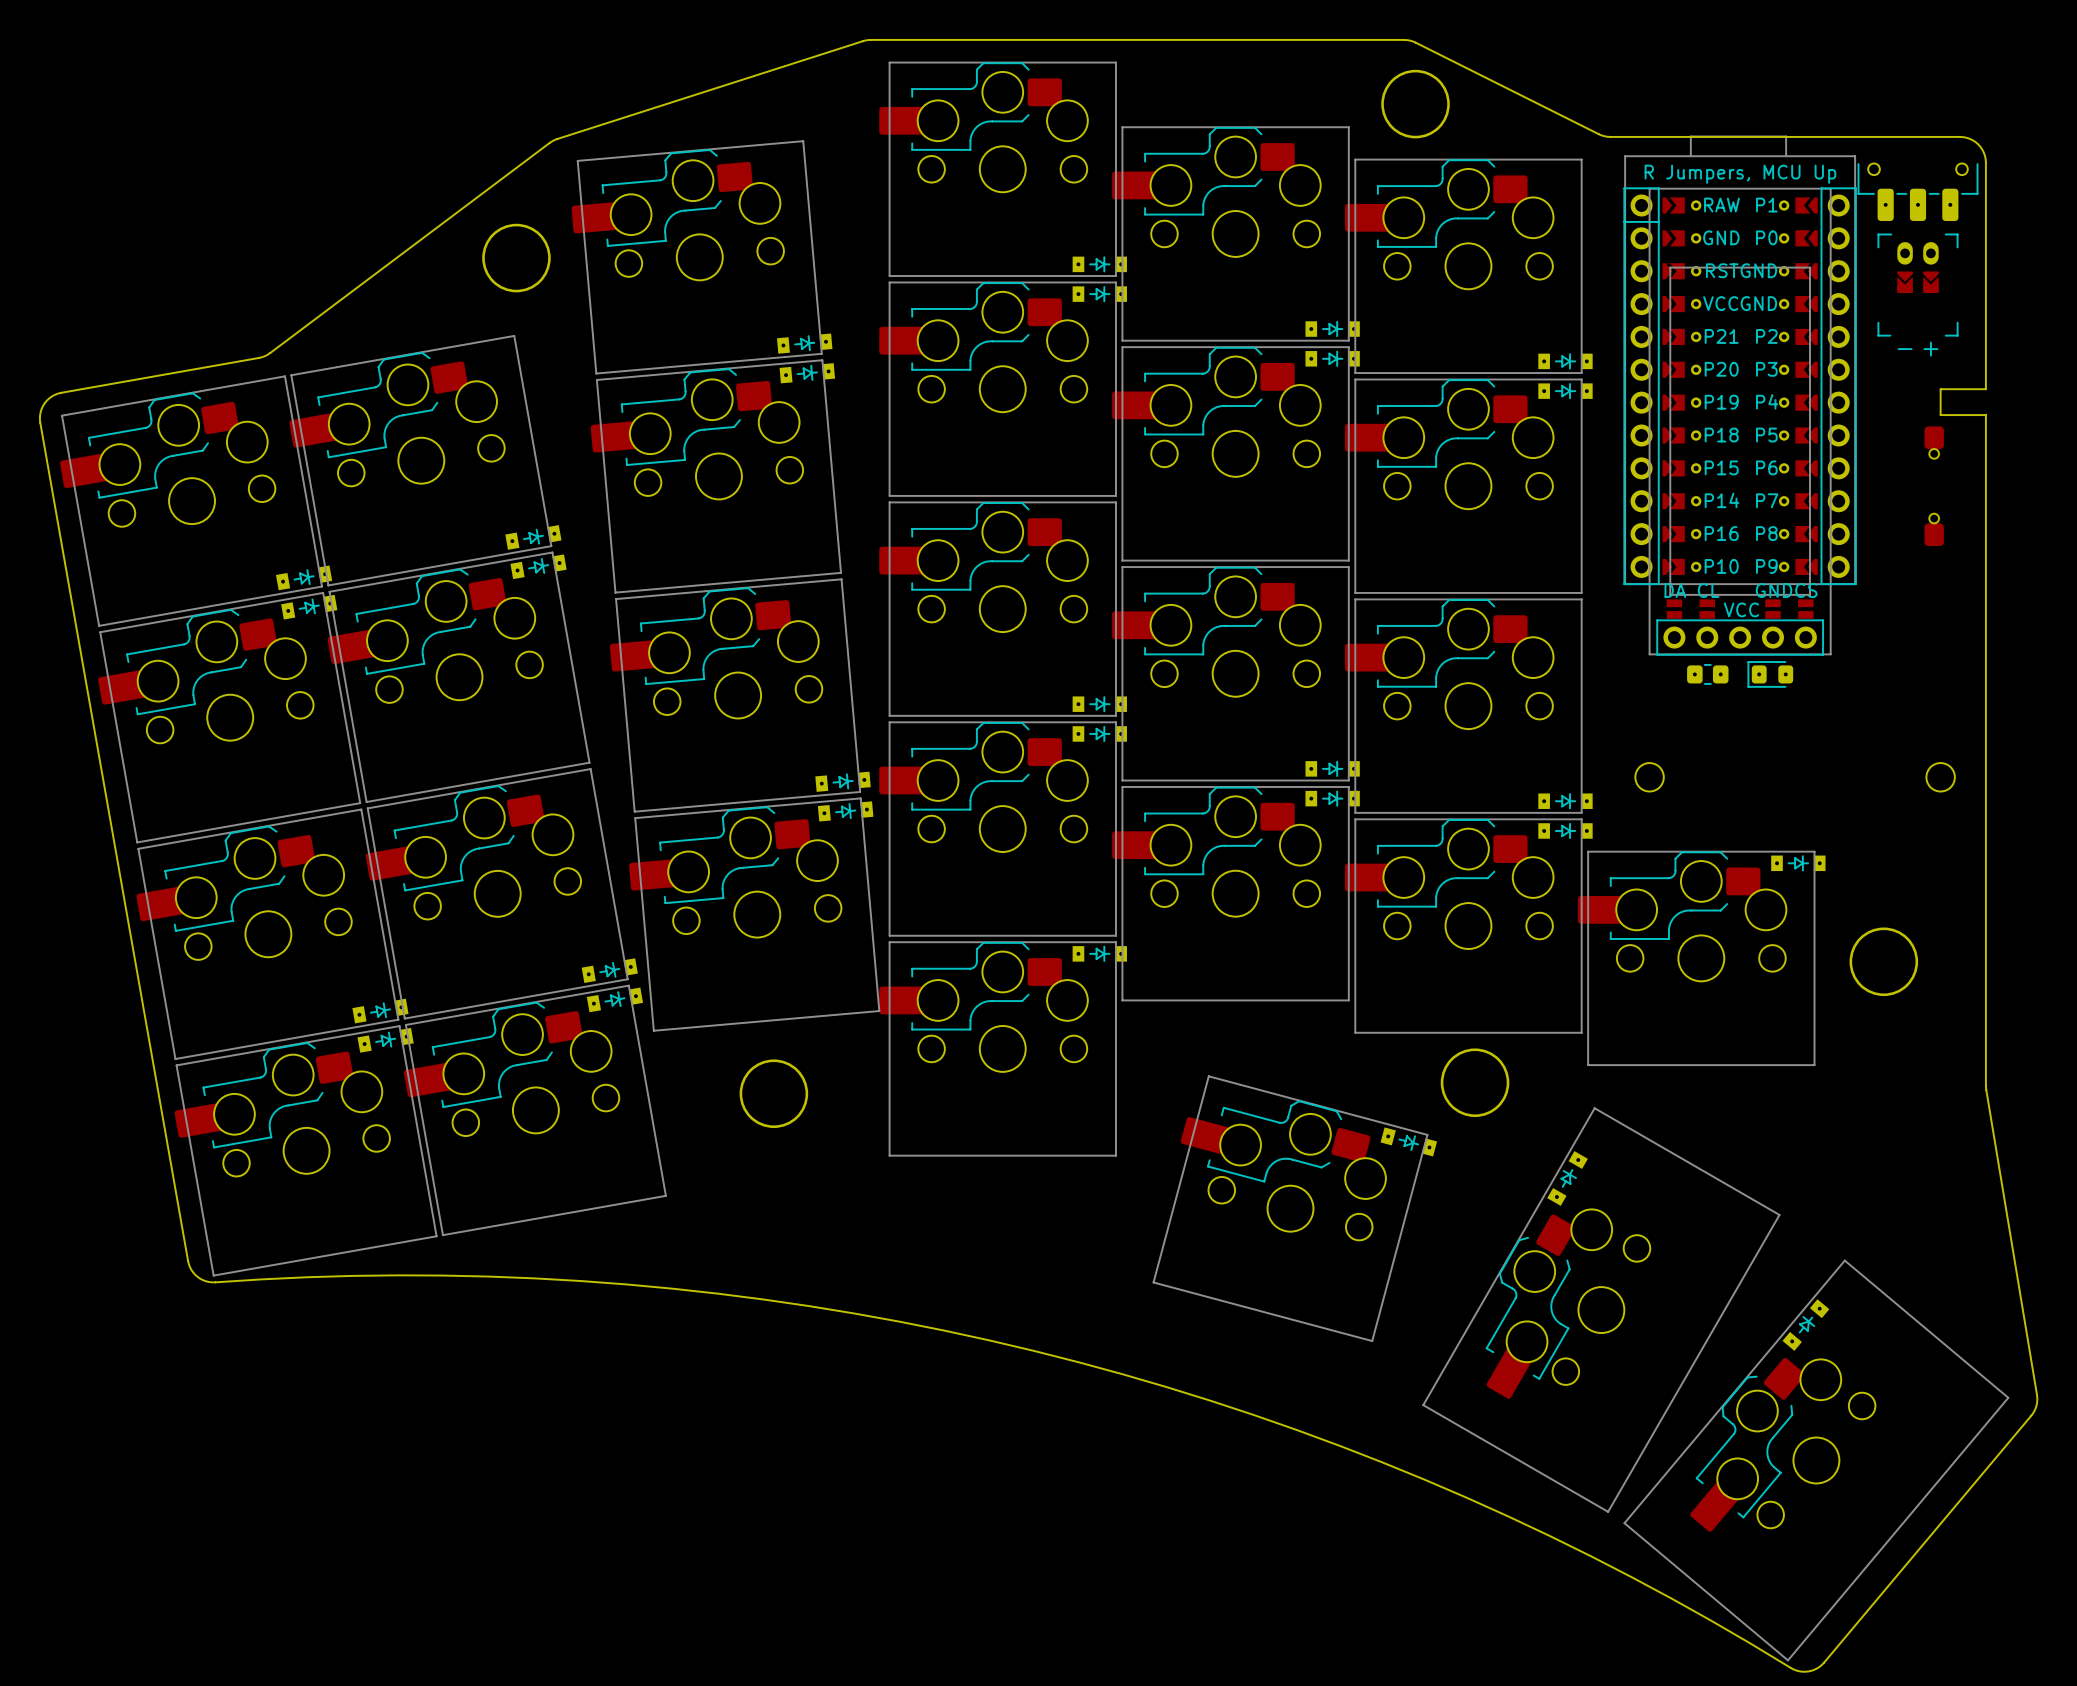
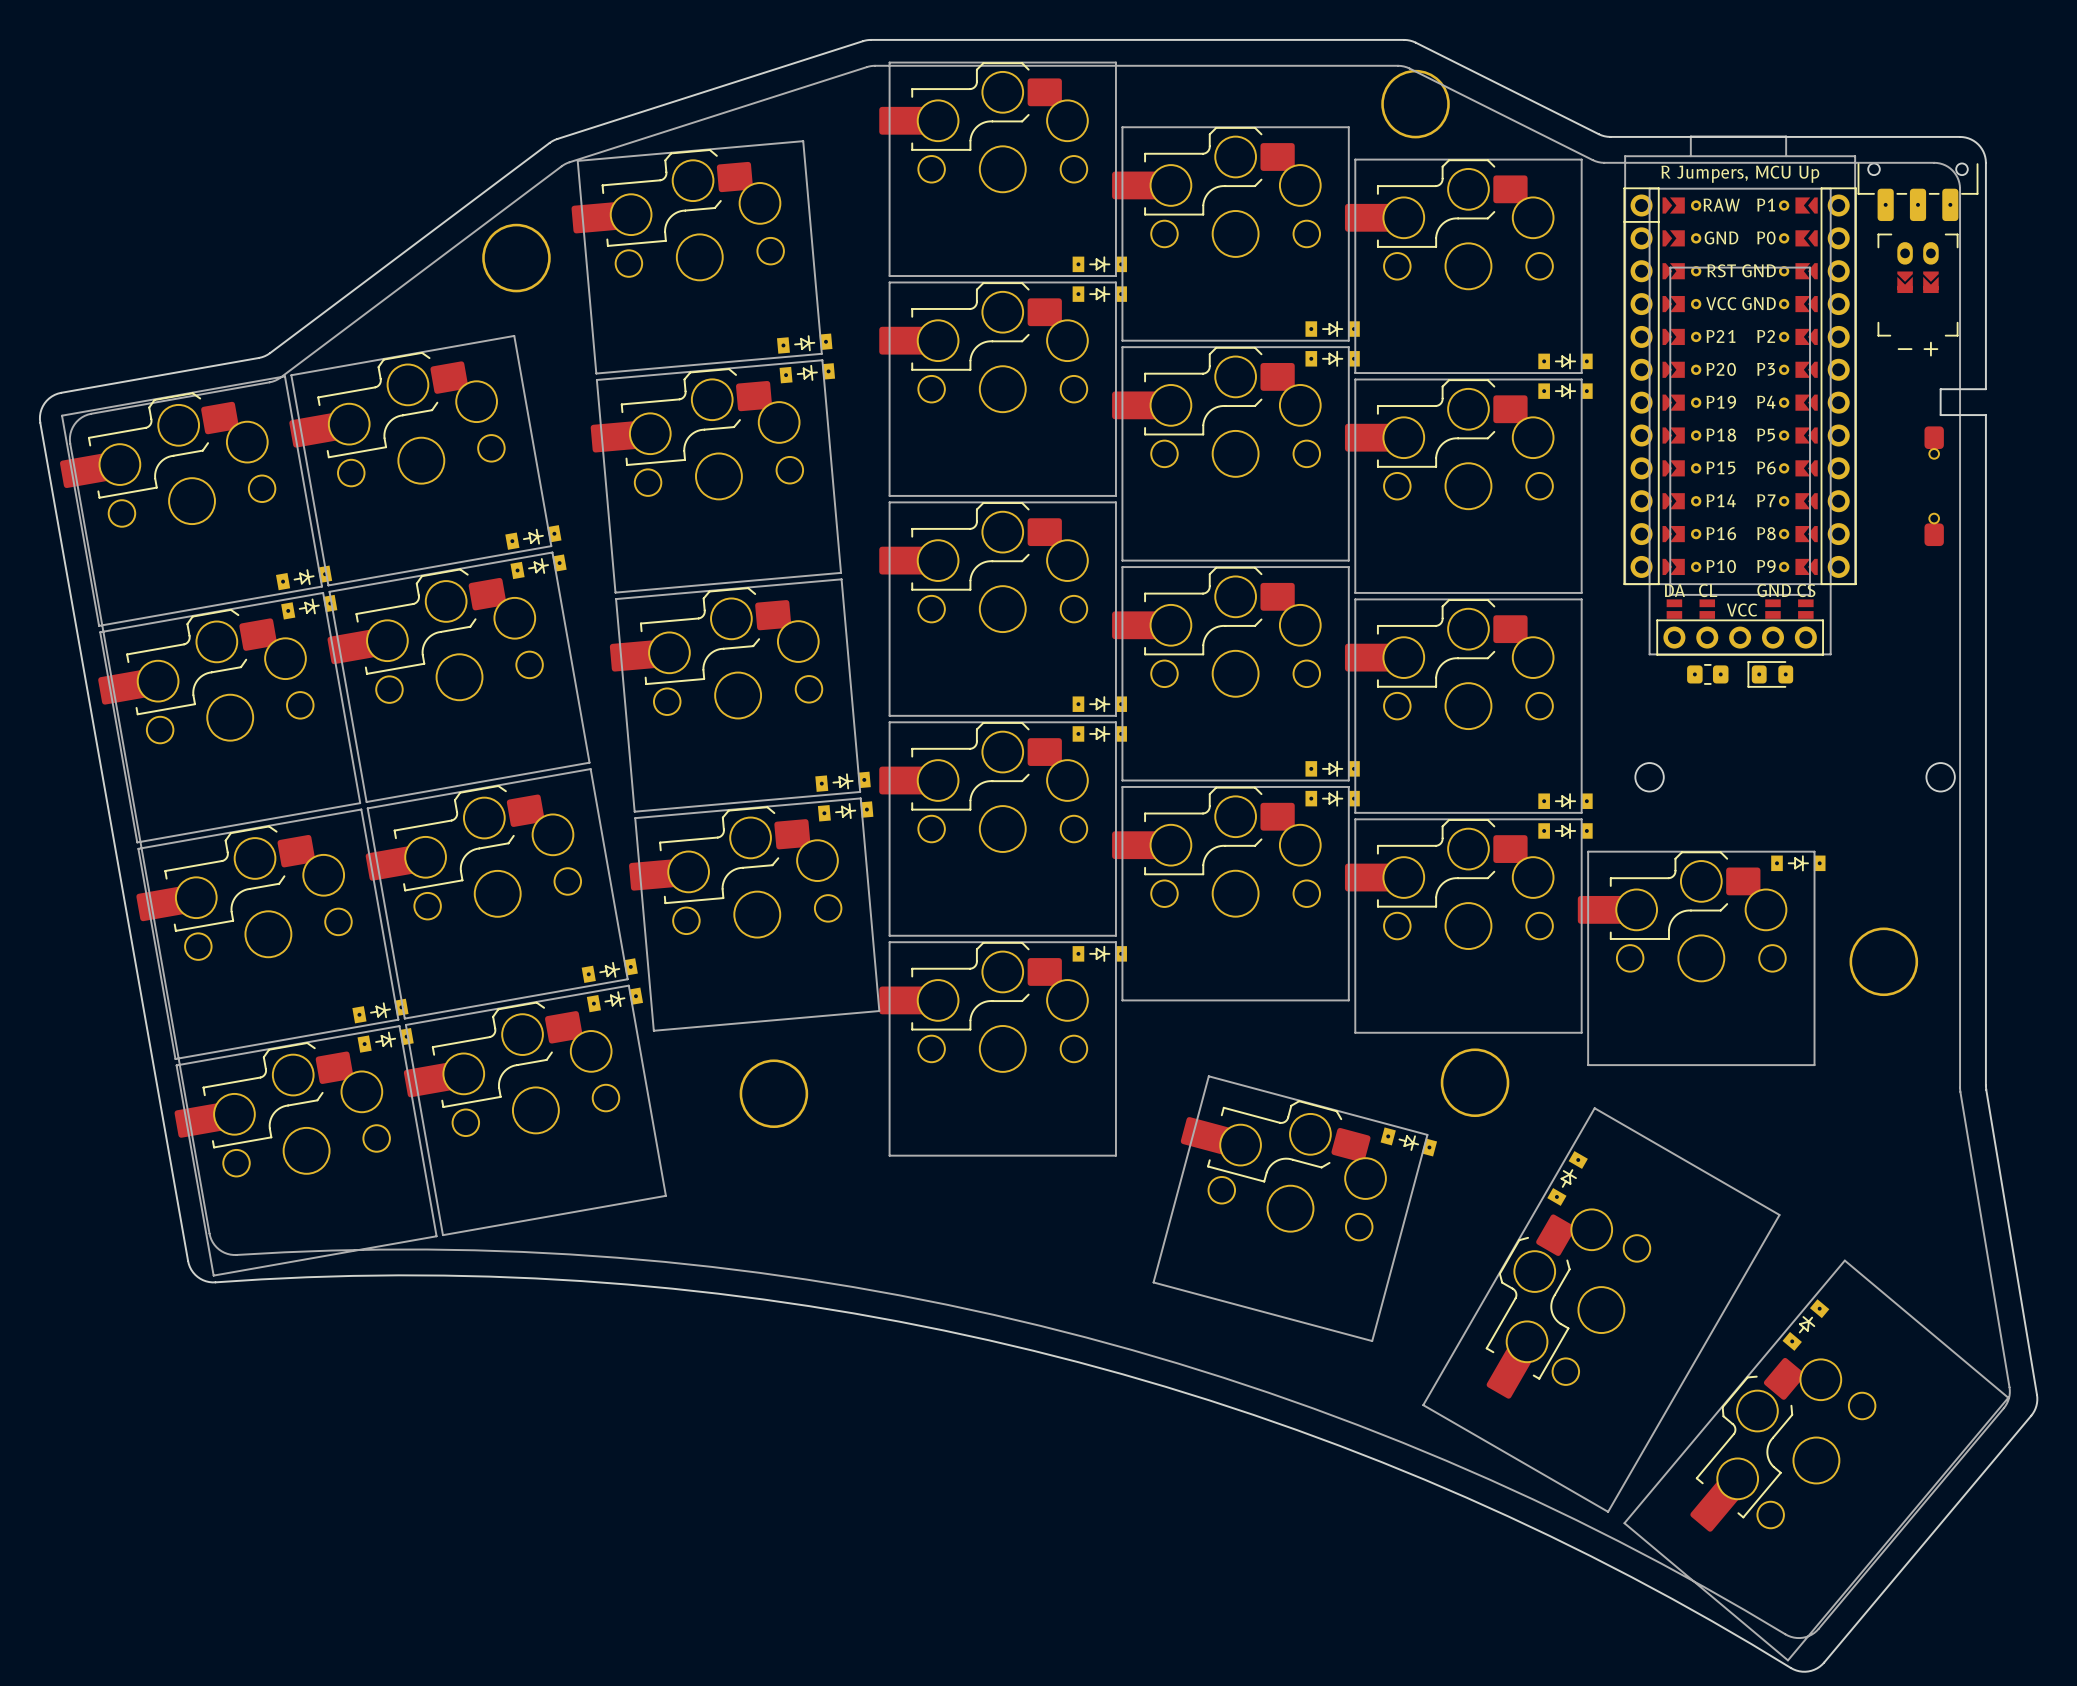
line: none -> (875, 65) (1401, 65) (1598, 162) (1934, 162) (1945, 165) (1956, 174) (1960, 188) (1960, 1089) (2009, 1392) (2003, 1408) (1818, 1628) (1811, 1634) (1800, 1638) (1788, 1635) (1703, 1586) (1619, 1541) (1490, 1479) (1402, 1442) (1313, 1408) (1223, 1377) (1132, 1350) (1040, 1325) (947, 1304) (853, 1287) (759, 1272) (664, 1261) (522, 1251) (427, 1249) (331, 1250) (233, 1254) (221, 1251) (212, 1242) (209, 1233) (70, 443) (72, 427) (81, 417) (91, 413) (275, 380) (565, 163) (875, 65)

